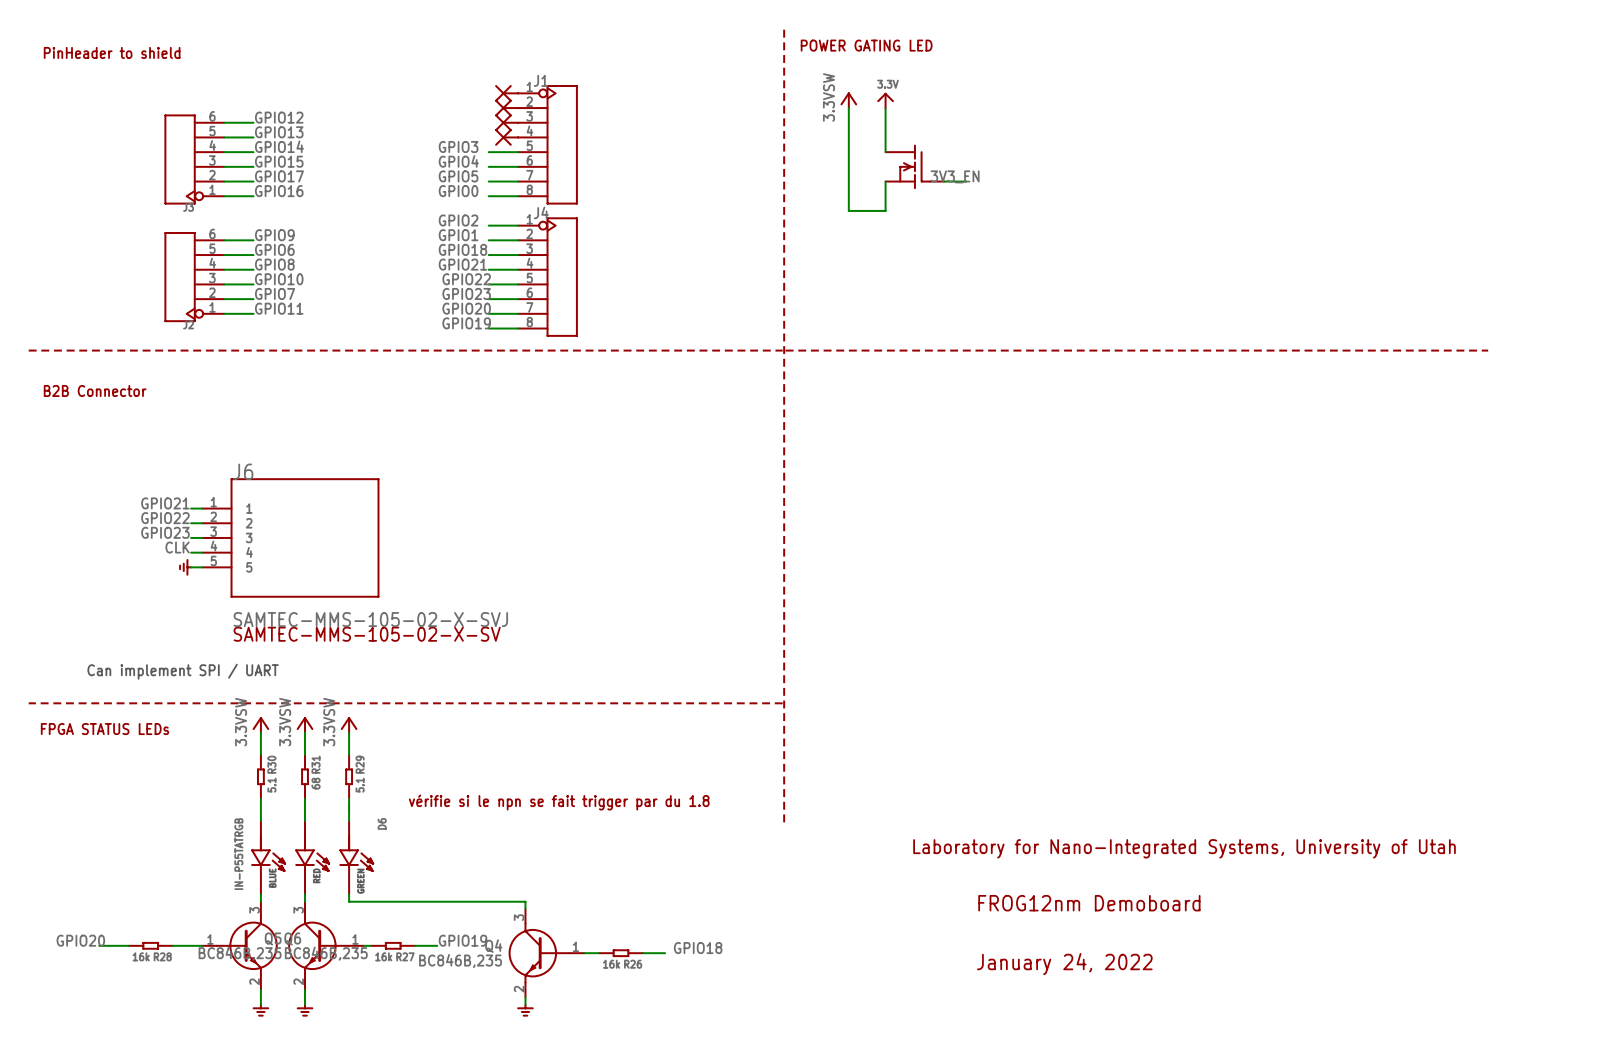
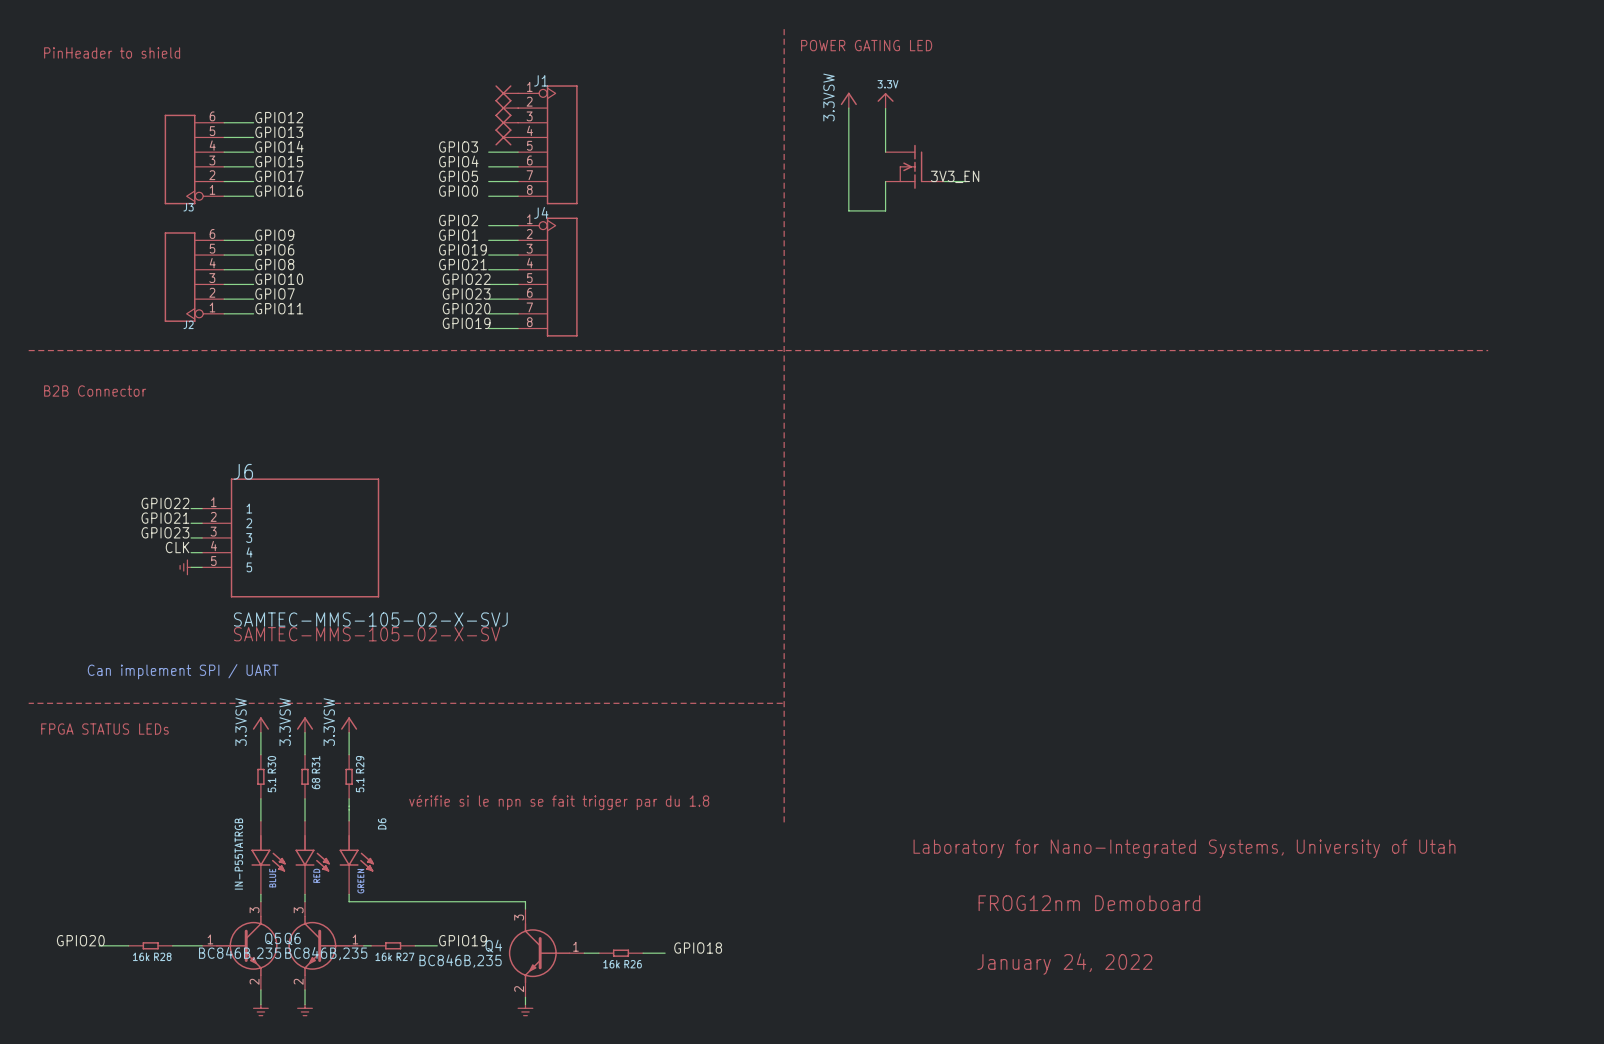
label: GPIO18 (462, 249) -> GPIO19 (462, 249)
label: GPIO21 (165, 503) -> GPIO22 (165, 503)
label: GPIO22 (165, 518) -> GPIO21 (165, 518)

